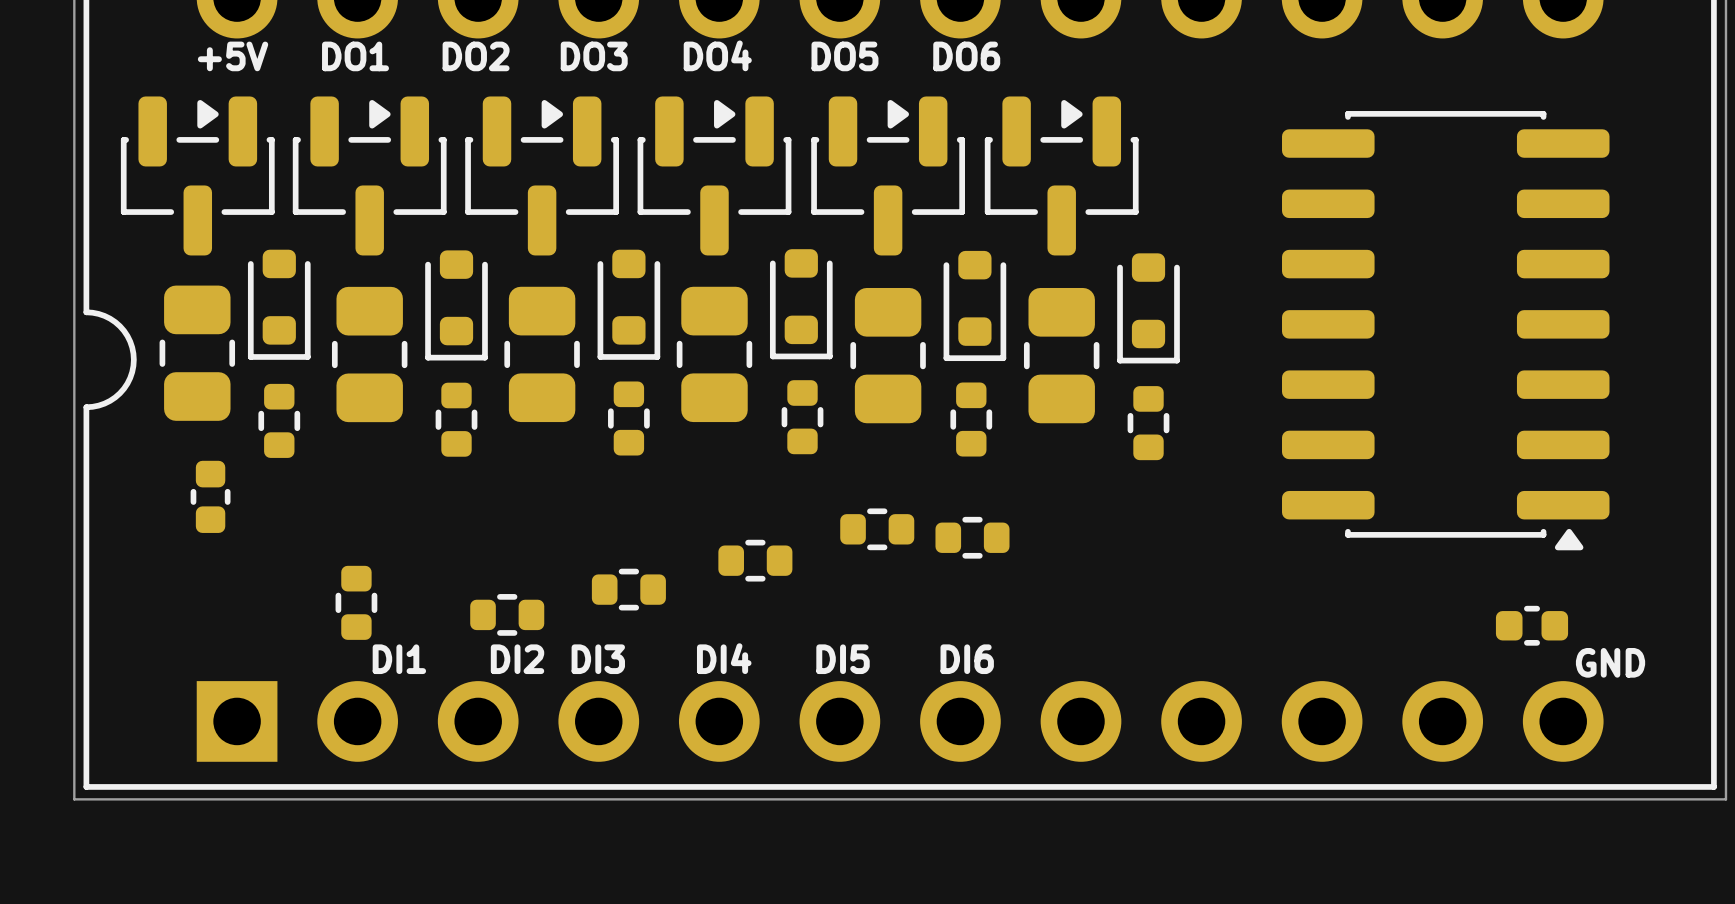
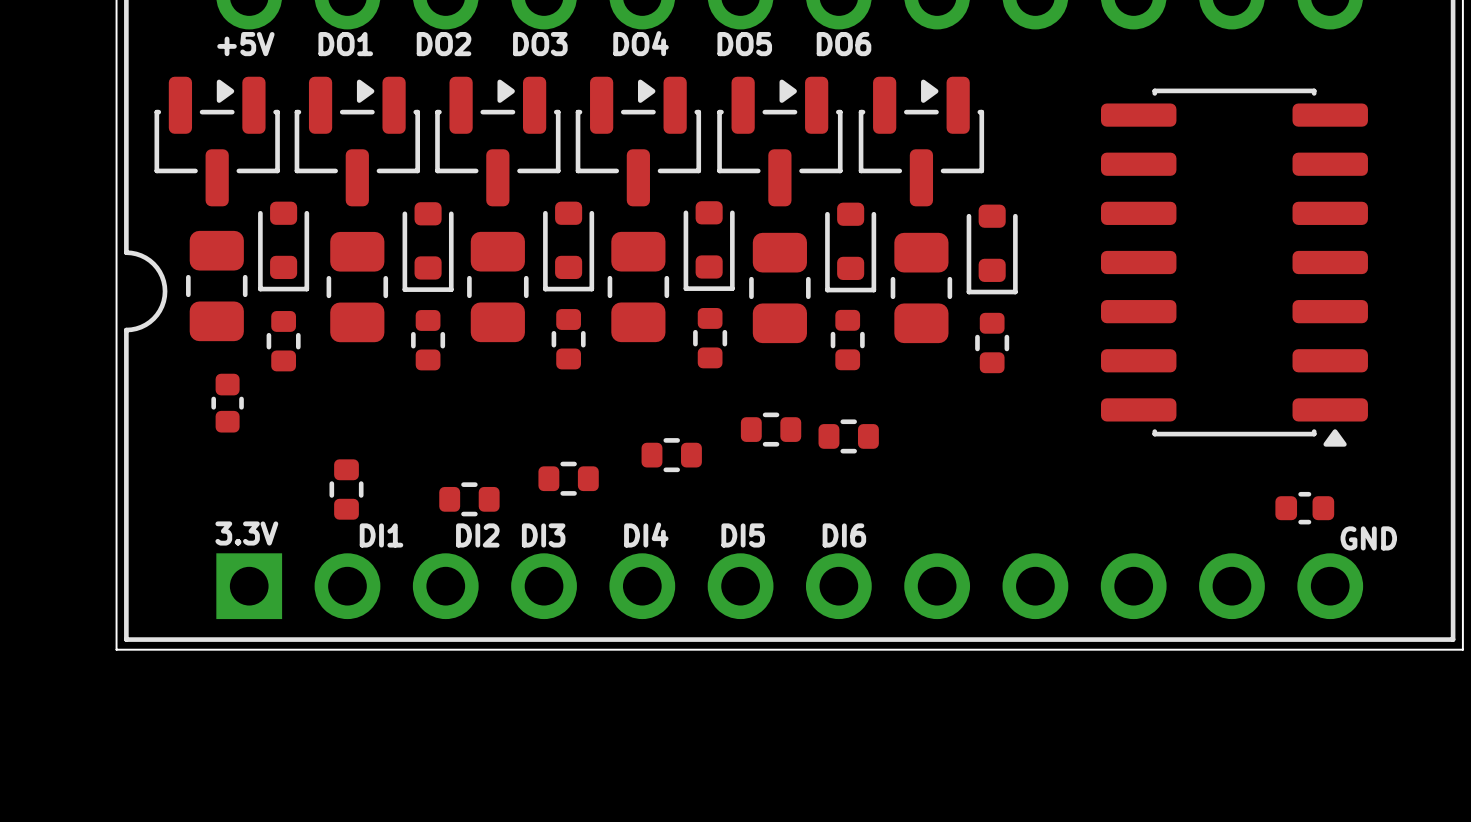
text: none -> 3.3V (246, 533)

